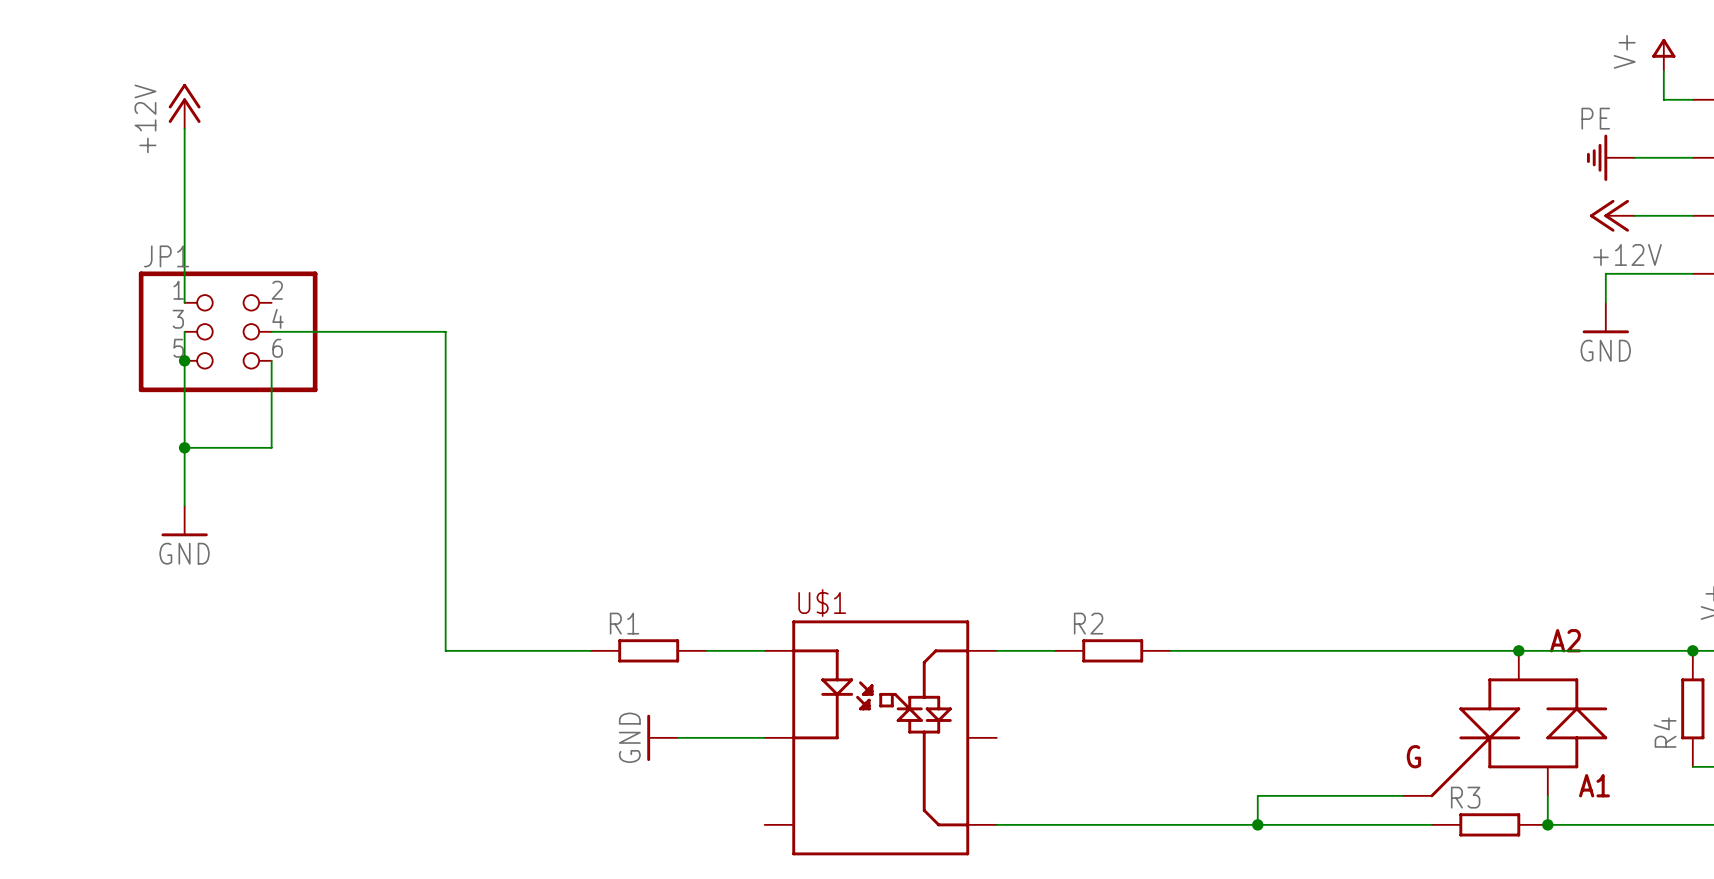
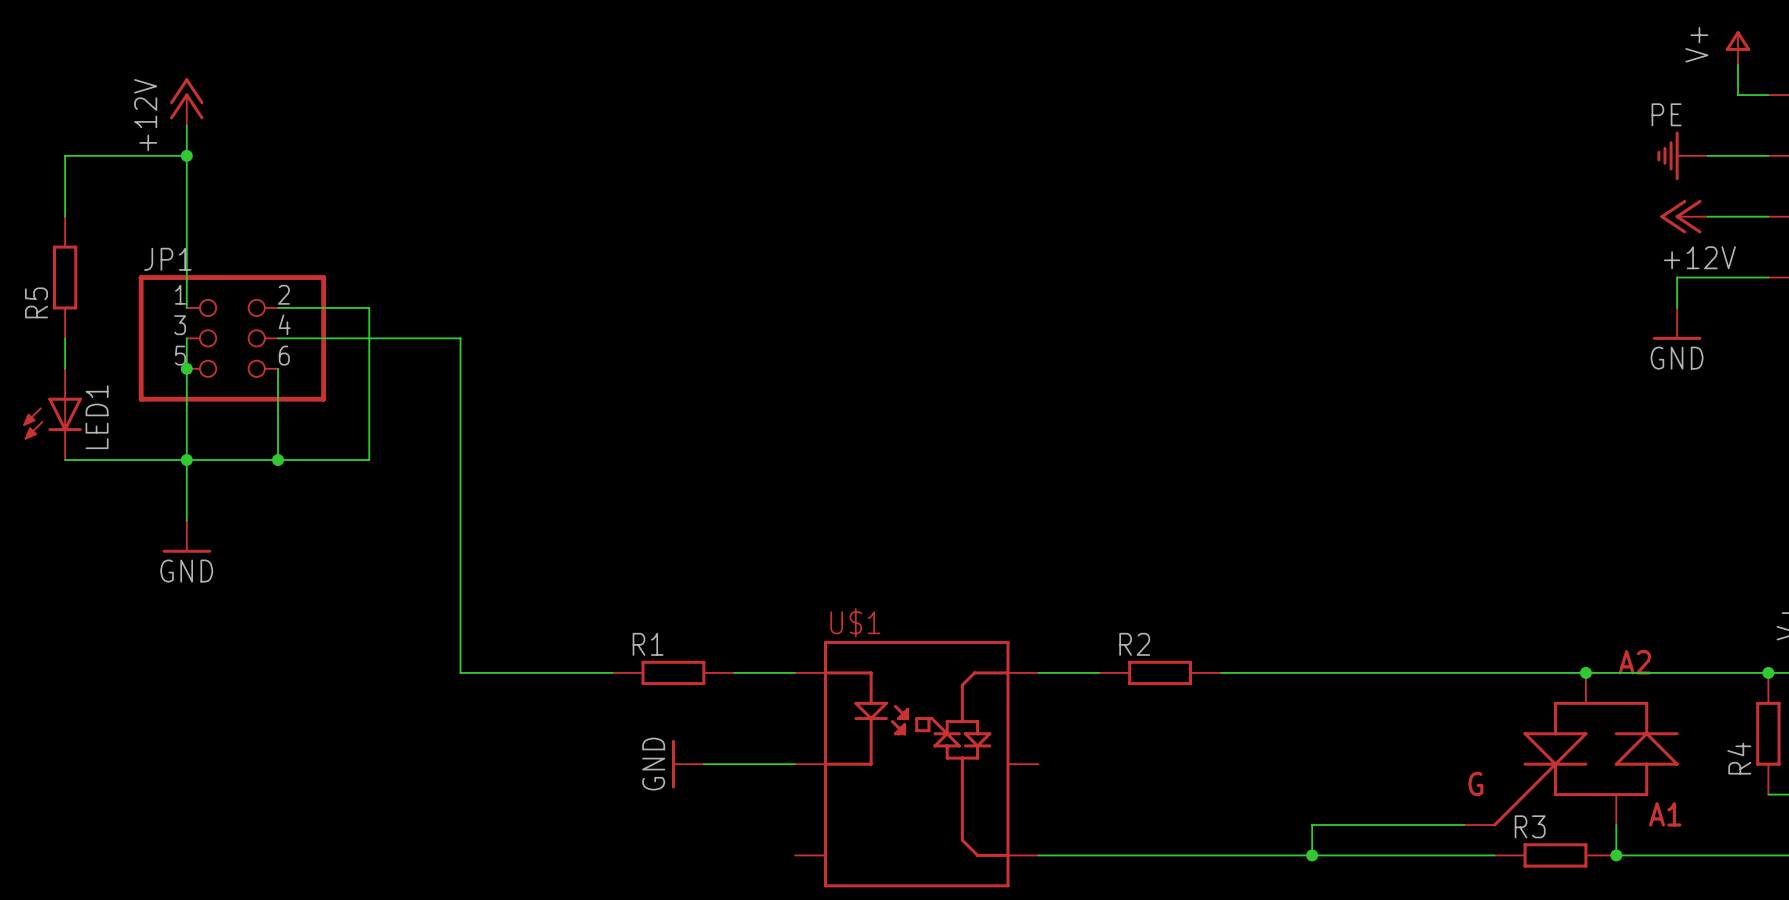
wire: none -> (186, 155) (65, 155) (65, 216)
junction: none -> (186, 155)
R5: none -> (65, 277)
wire: none -> (278, 307) (369, 307) (369, 460) (278, 460)
wire: none -> (65, 338) (65, 368)
LED1: none -> (52, 414)
wire: none -> (65, 460) (186, 460)
junction: none -> (278, 460)

